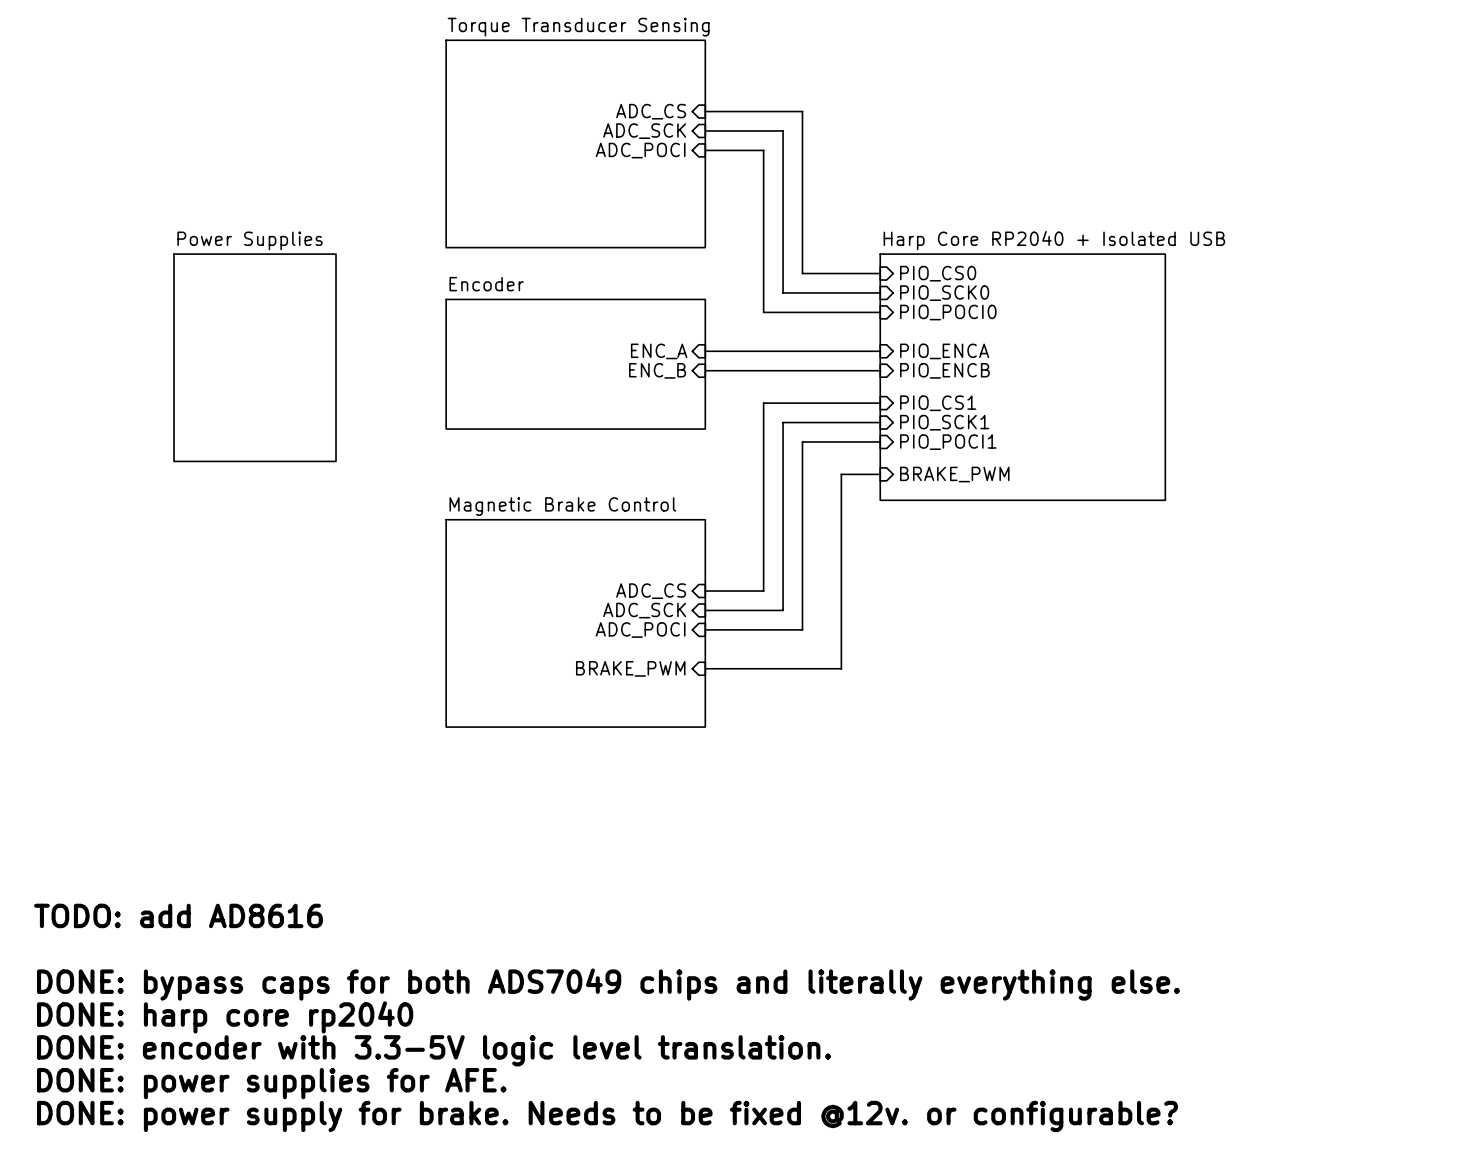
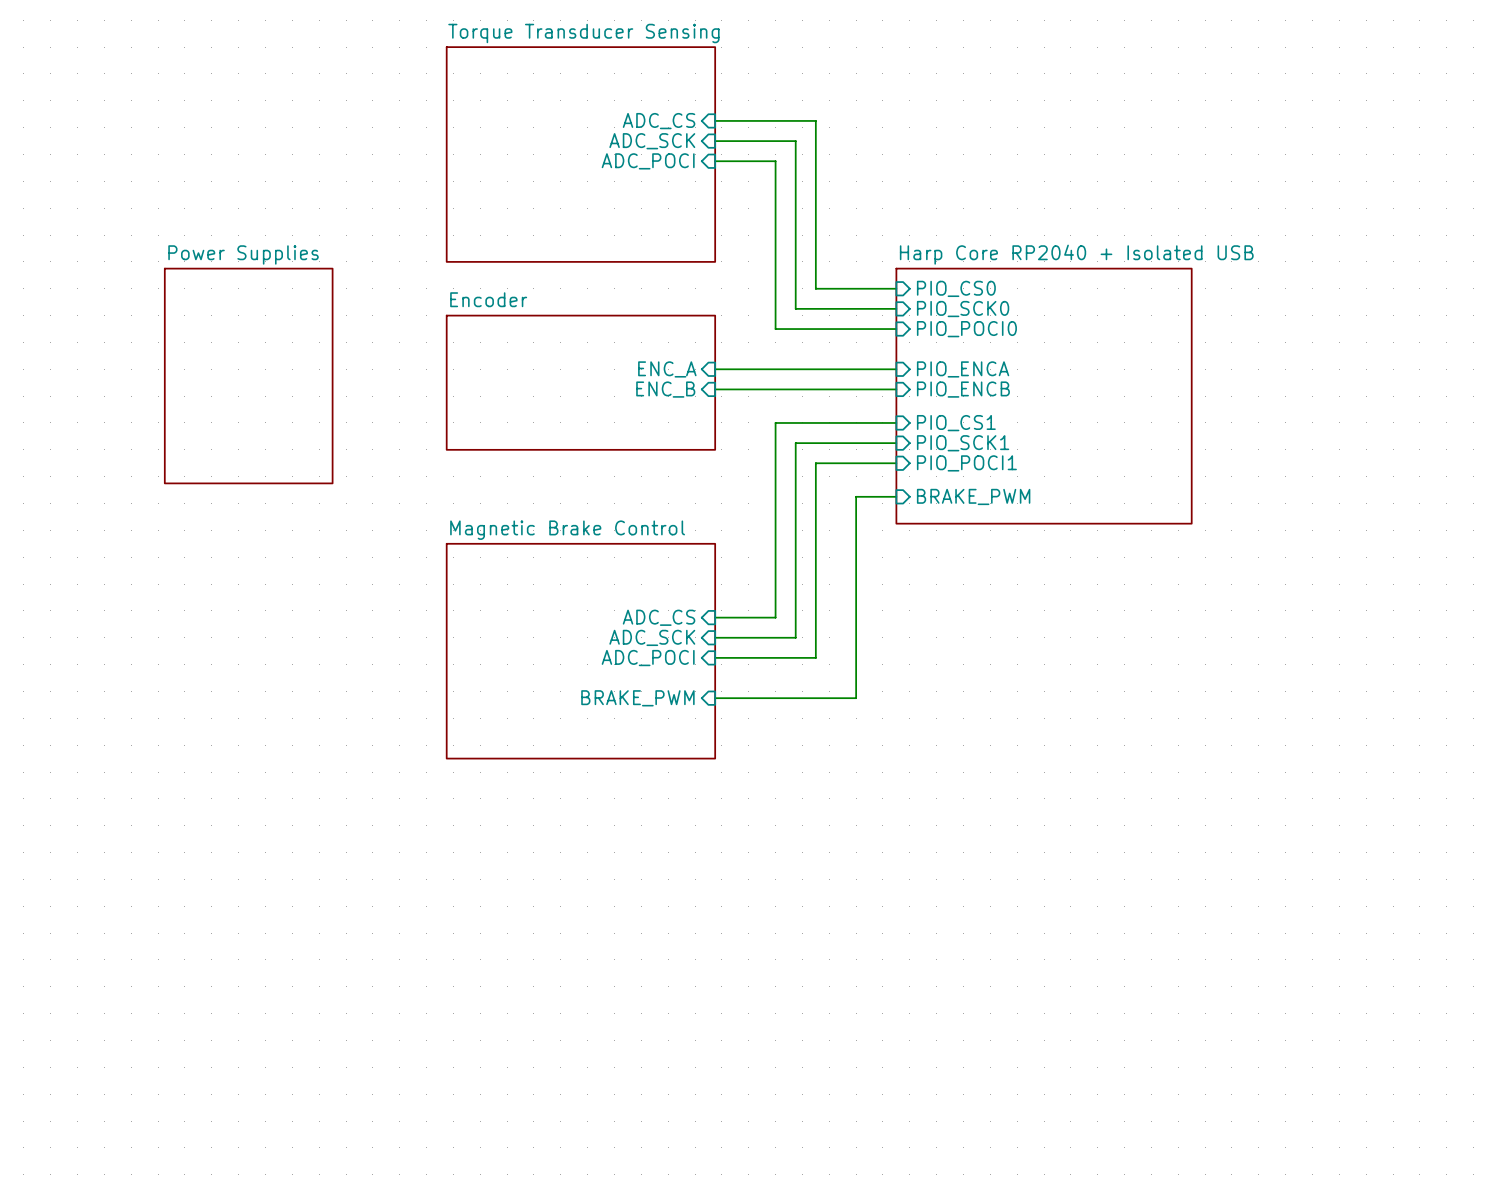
text: TODO: add AD8616 (178, 915) -> none
text: DONE: bypass caps for both ADS7049 chips and literally everything else. (608, 984) -> none
text: DONE: harp core rp2040 (225, 1017) -> none
text: DONE: encoder with 3.3-5V logic level translation. (434, 1050) -> none
text: DONE: power supplies for AFE. (271, 1083) -> none
text: DONE: power supply for brake. Needs to be fixed @12v. or configurable? (607, 1116) -> none

